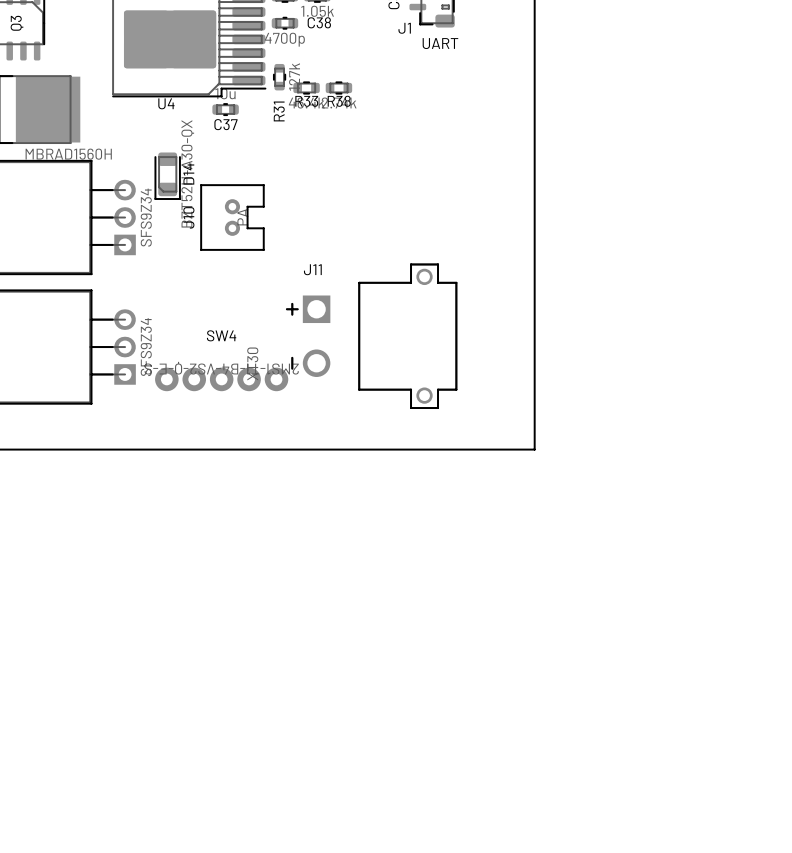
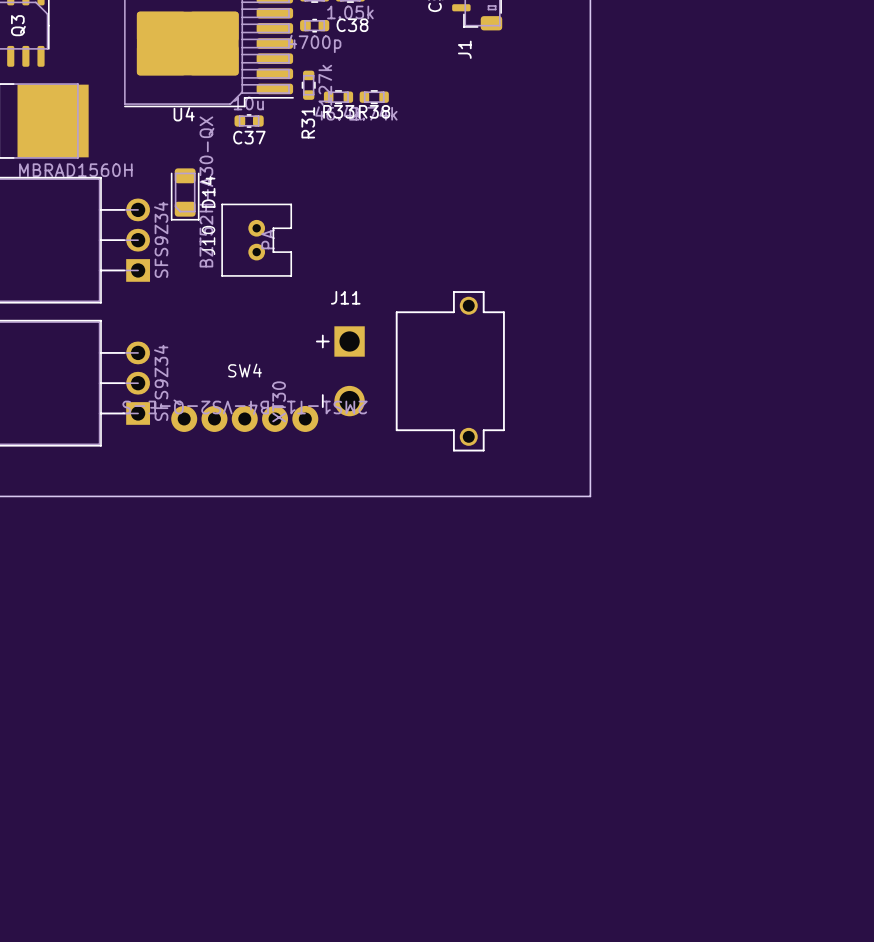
J1 name rotation: 0° (404, 28) -> 90° counterclockwise (464, 49)
text: UART (440, 43) -> none

